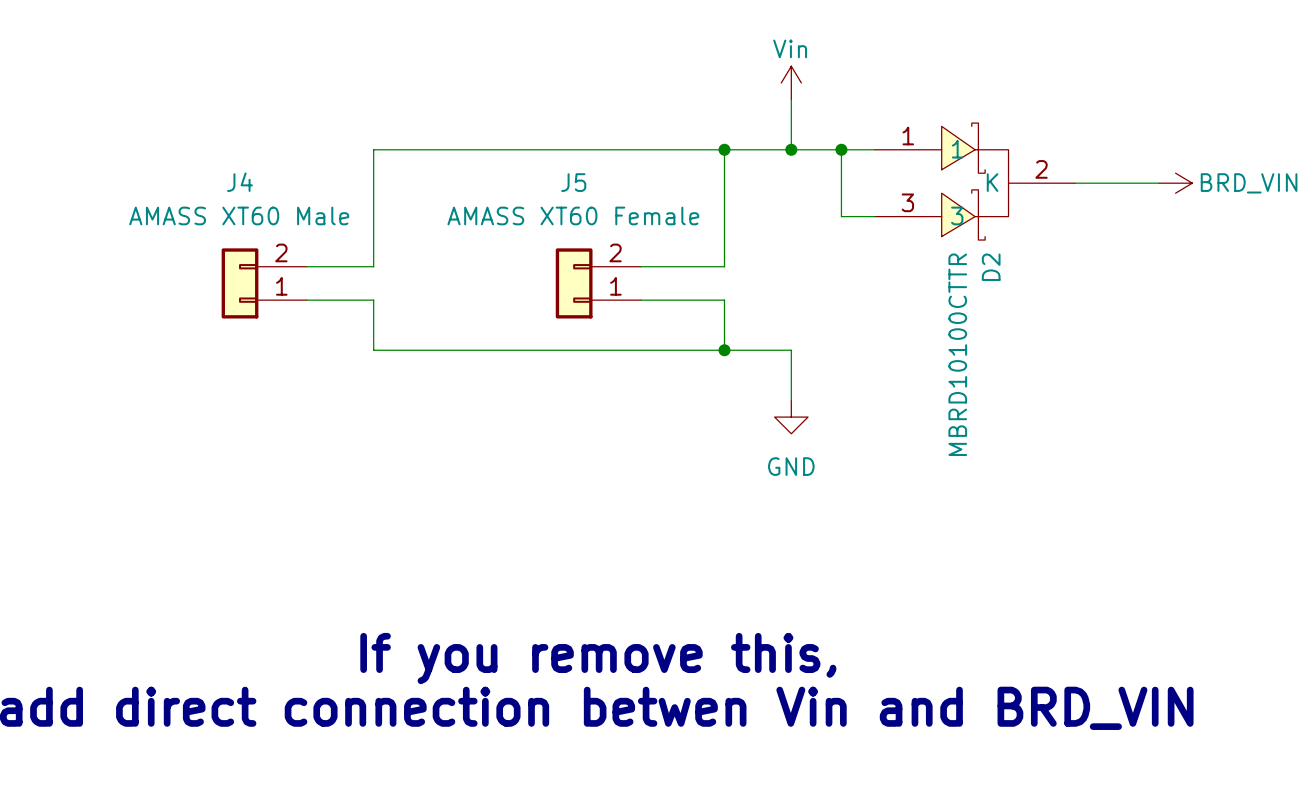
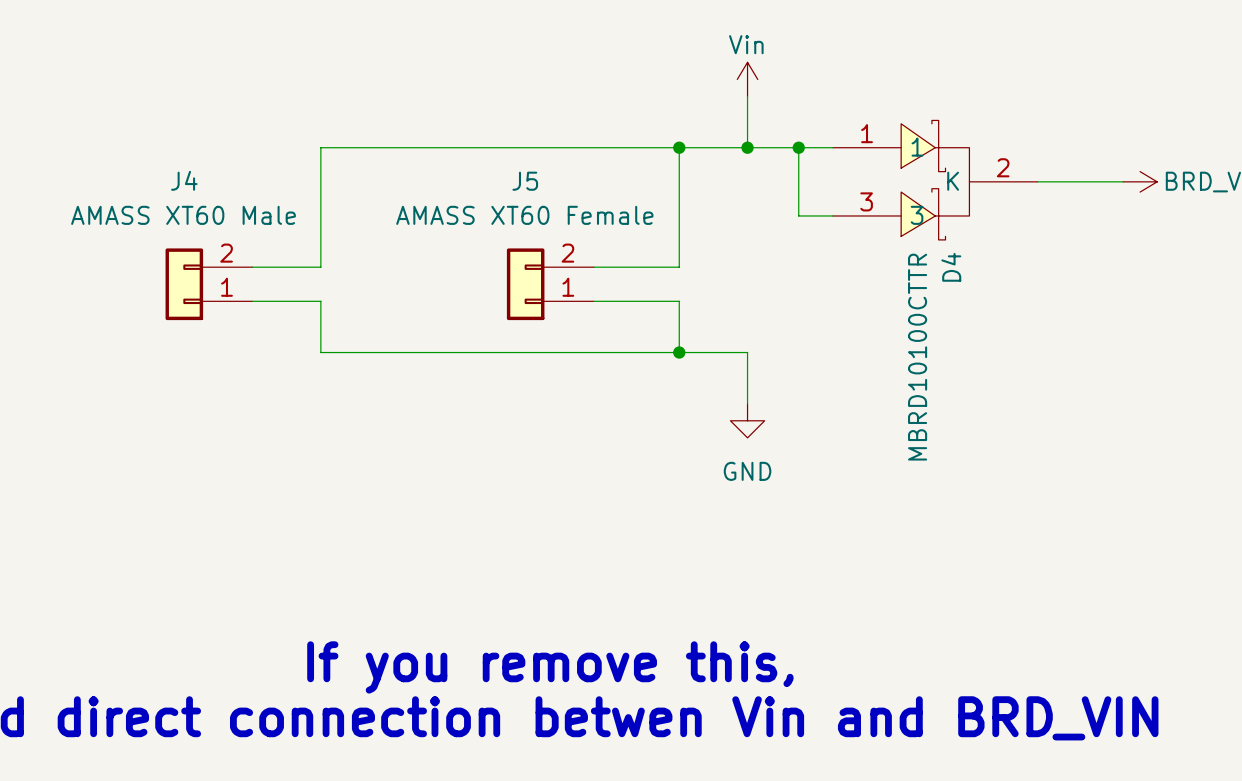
D2 name: D2 (991, 267) -> D4 (951, 267)

